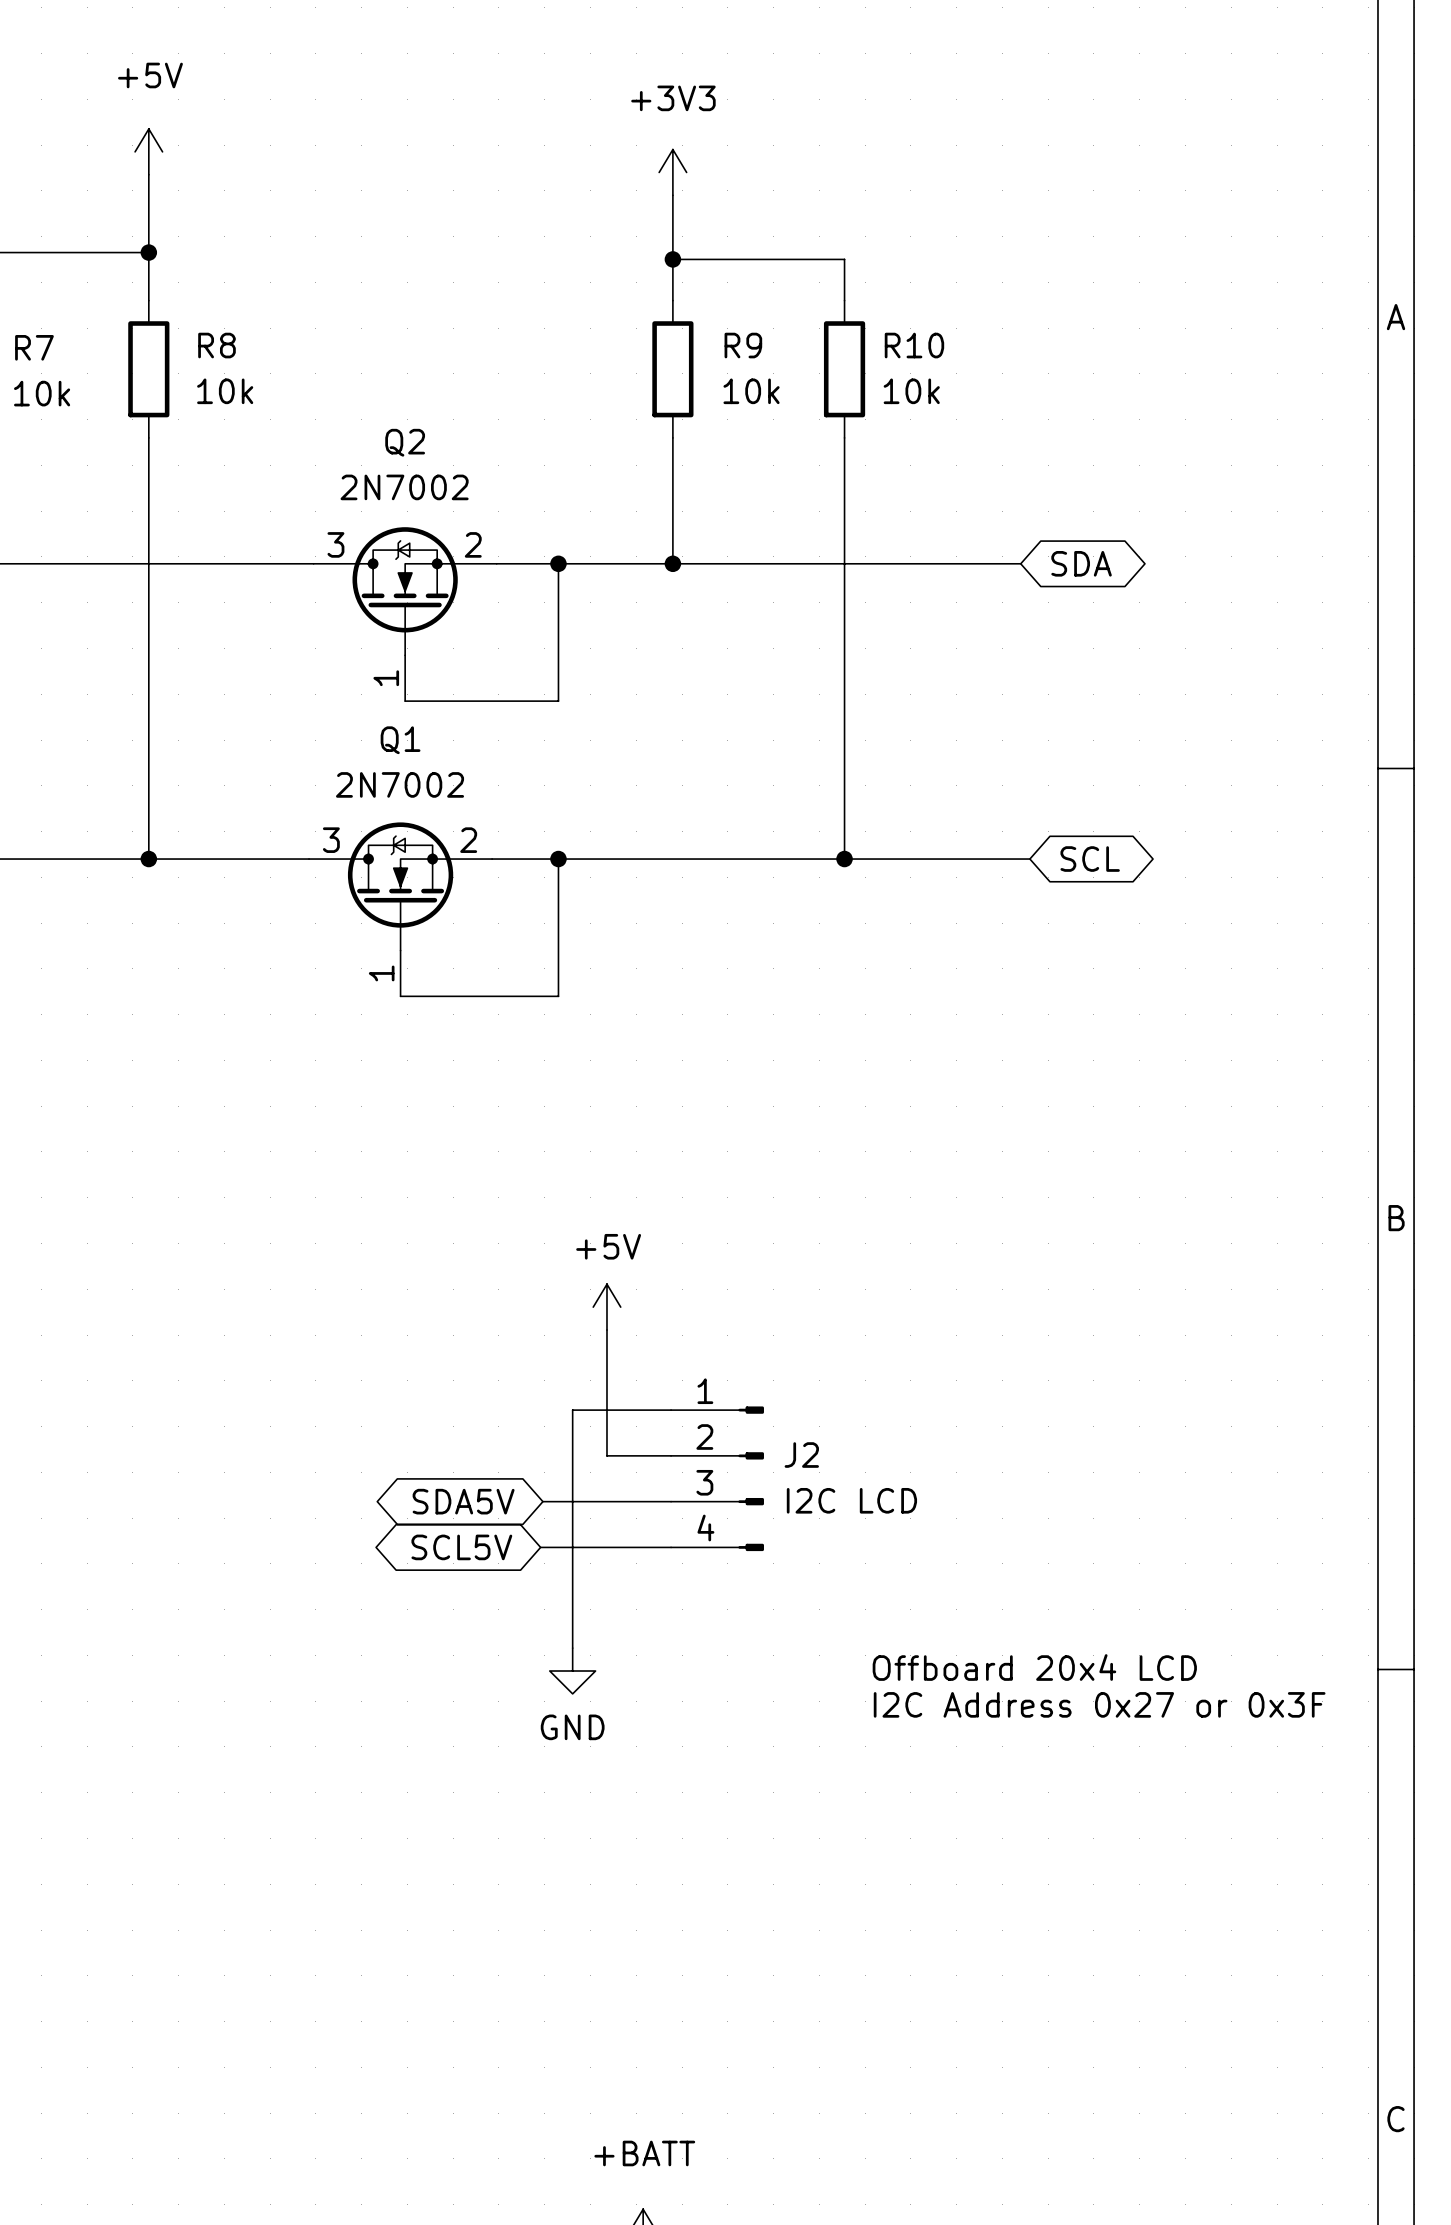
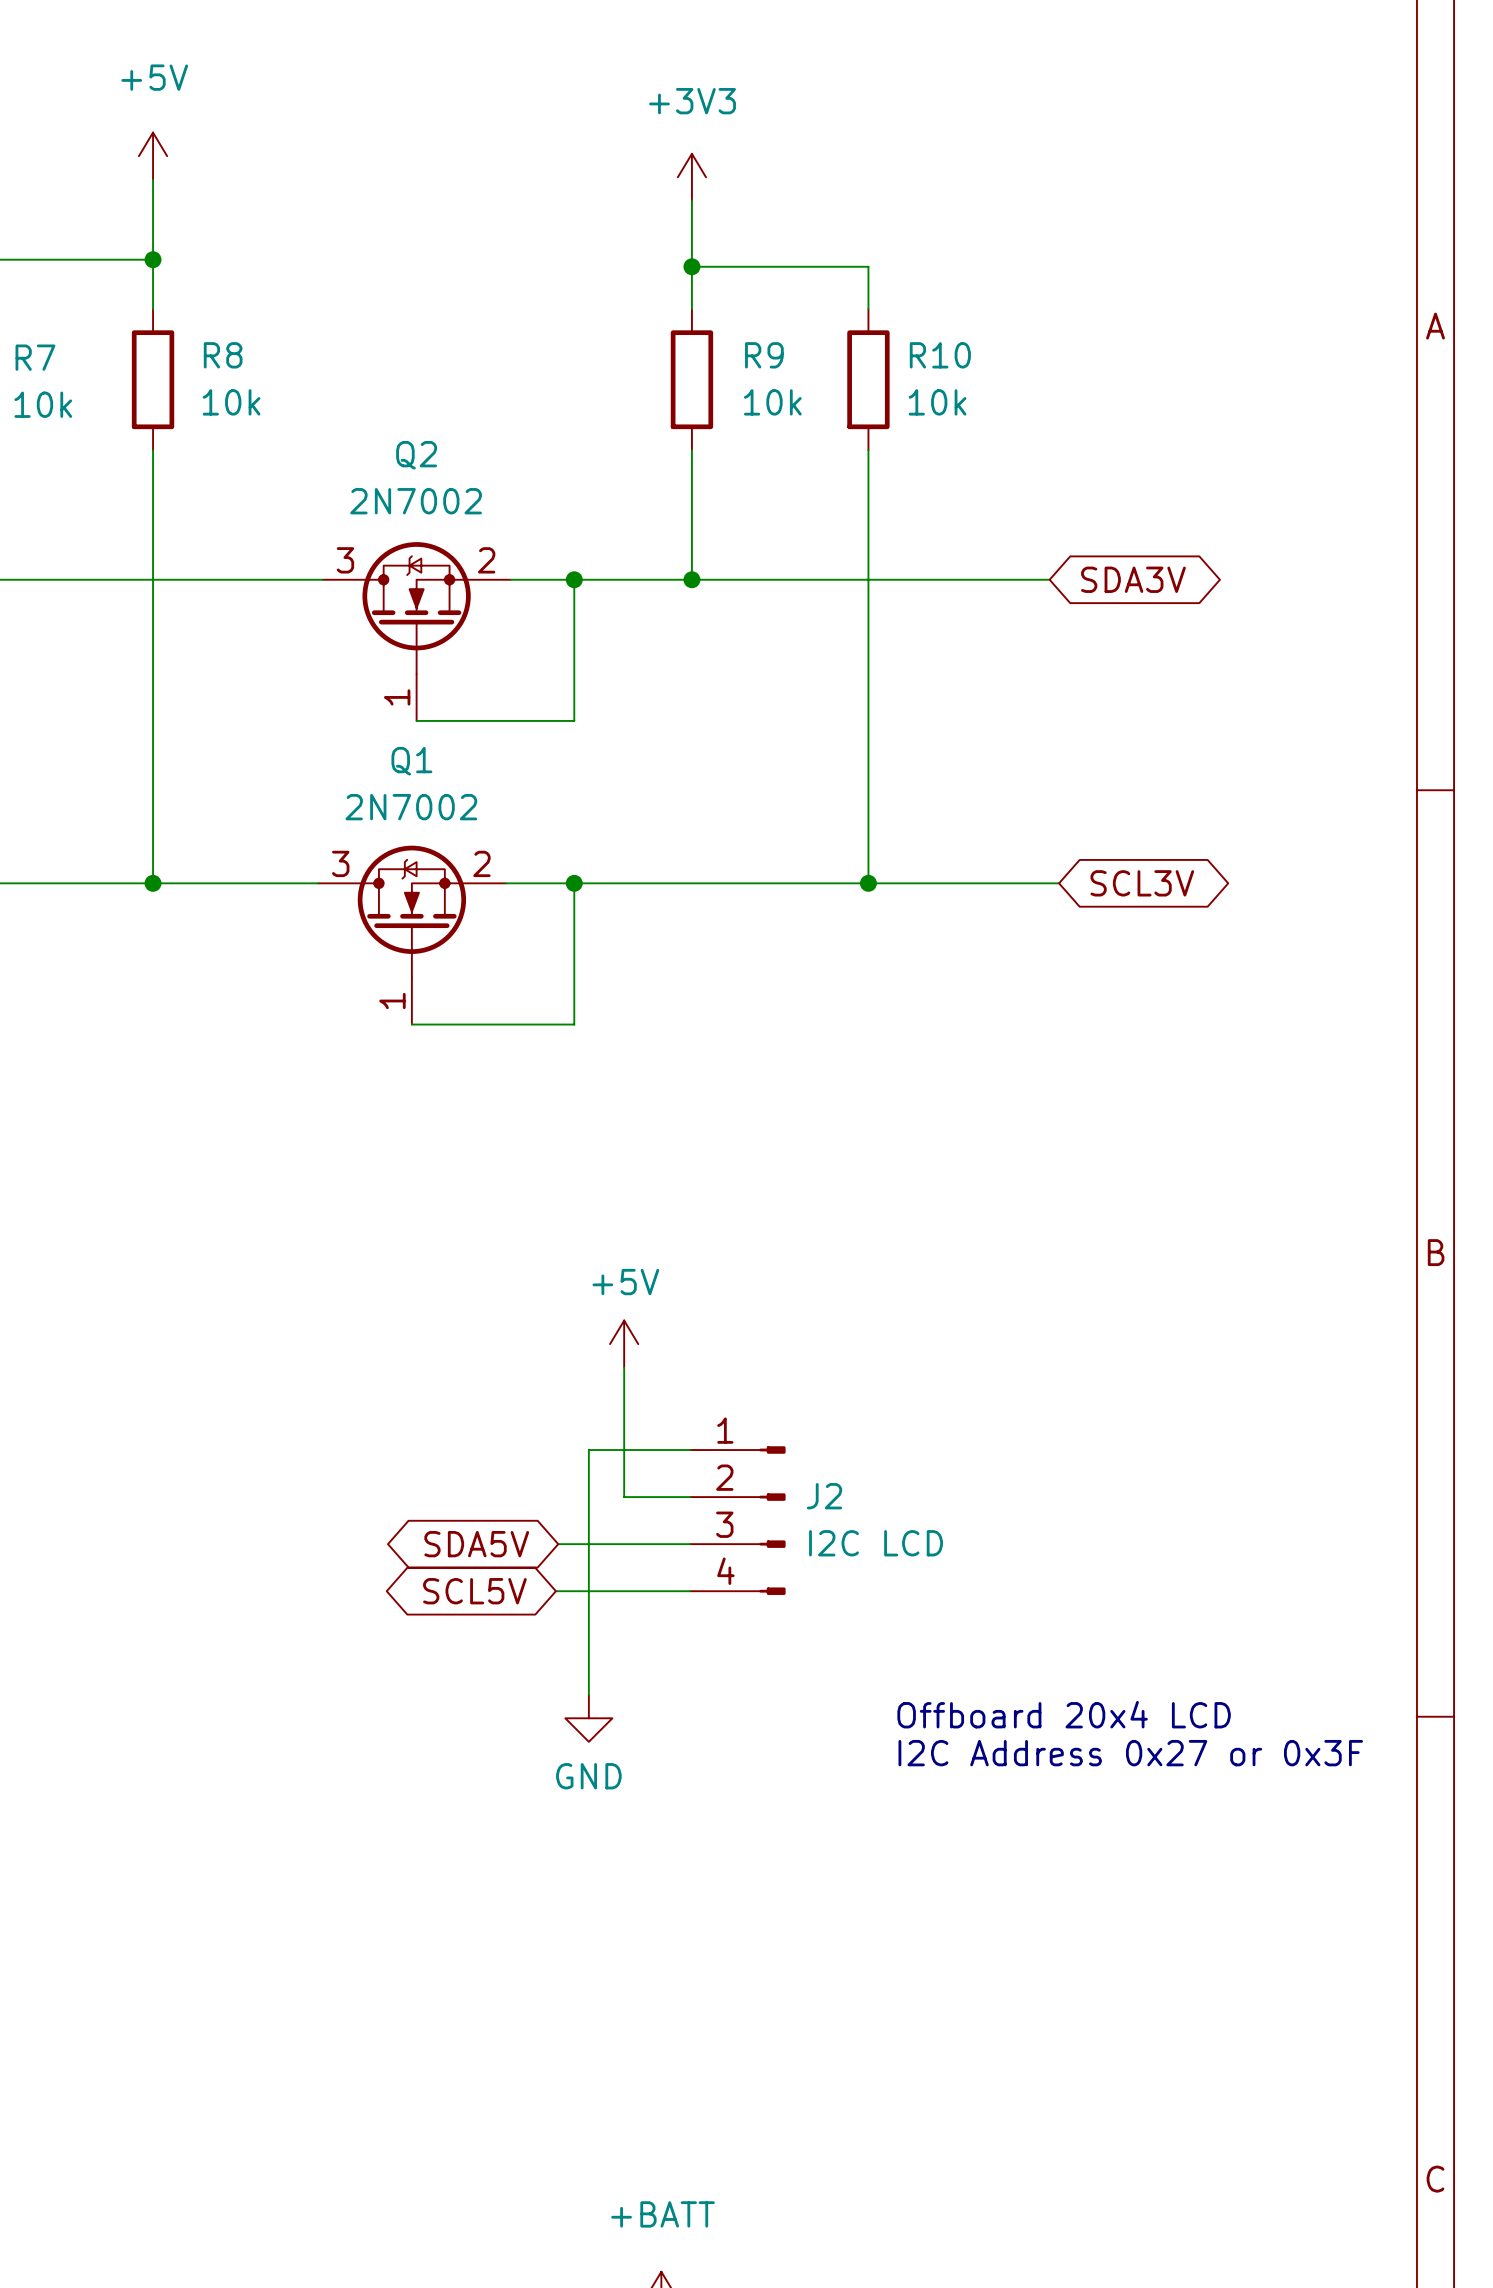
global label: SDA (1081, 563) -> SDA3V (1133, 579)
global label: SCL (1090, 859) -> SCL3V (1142, 883)

